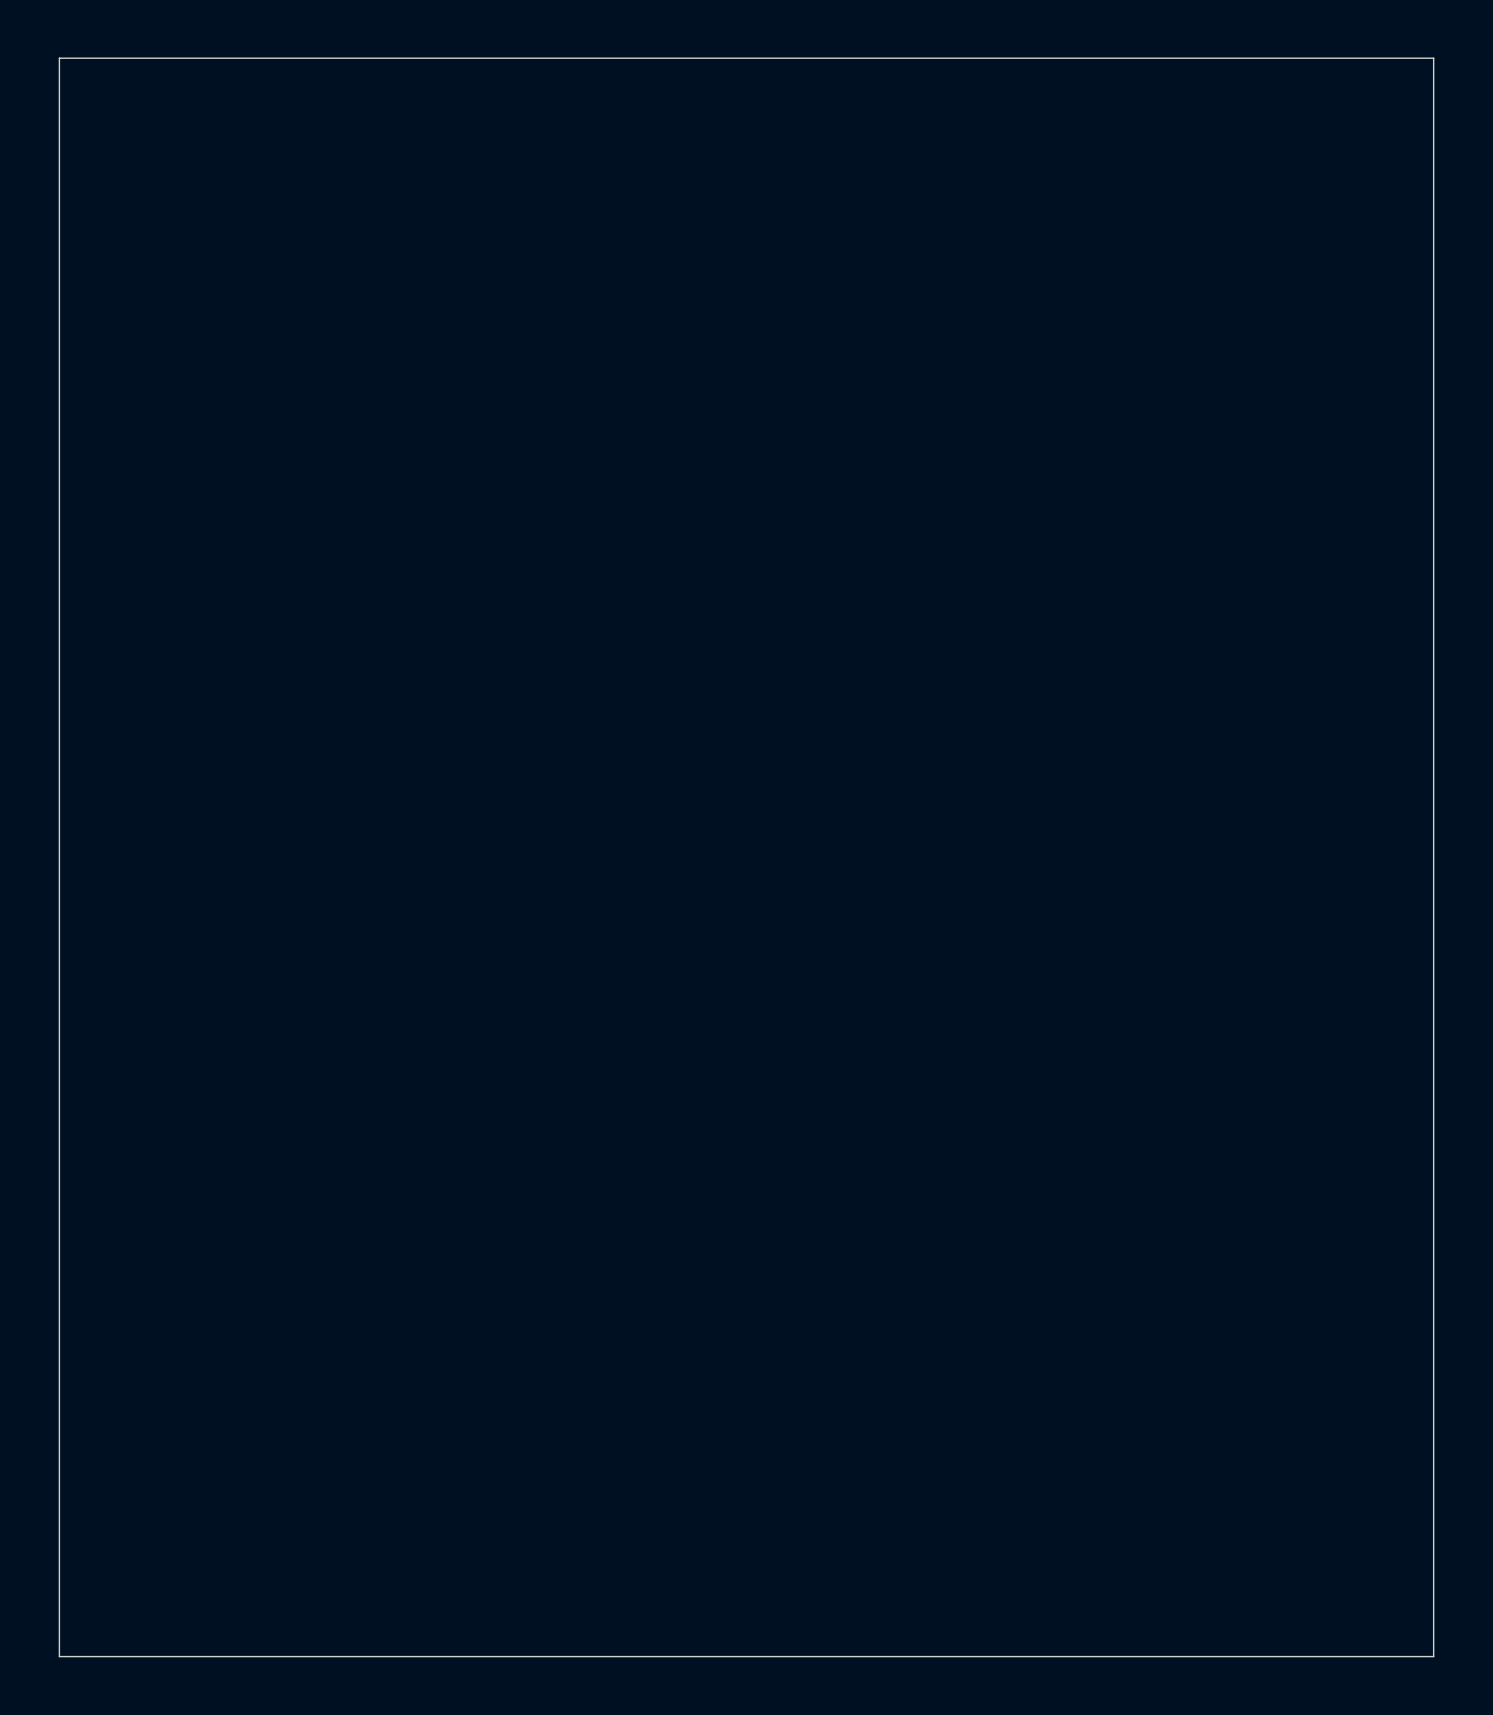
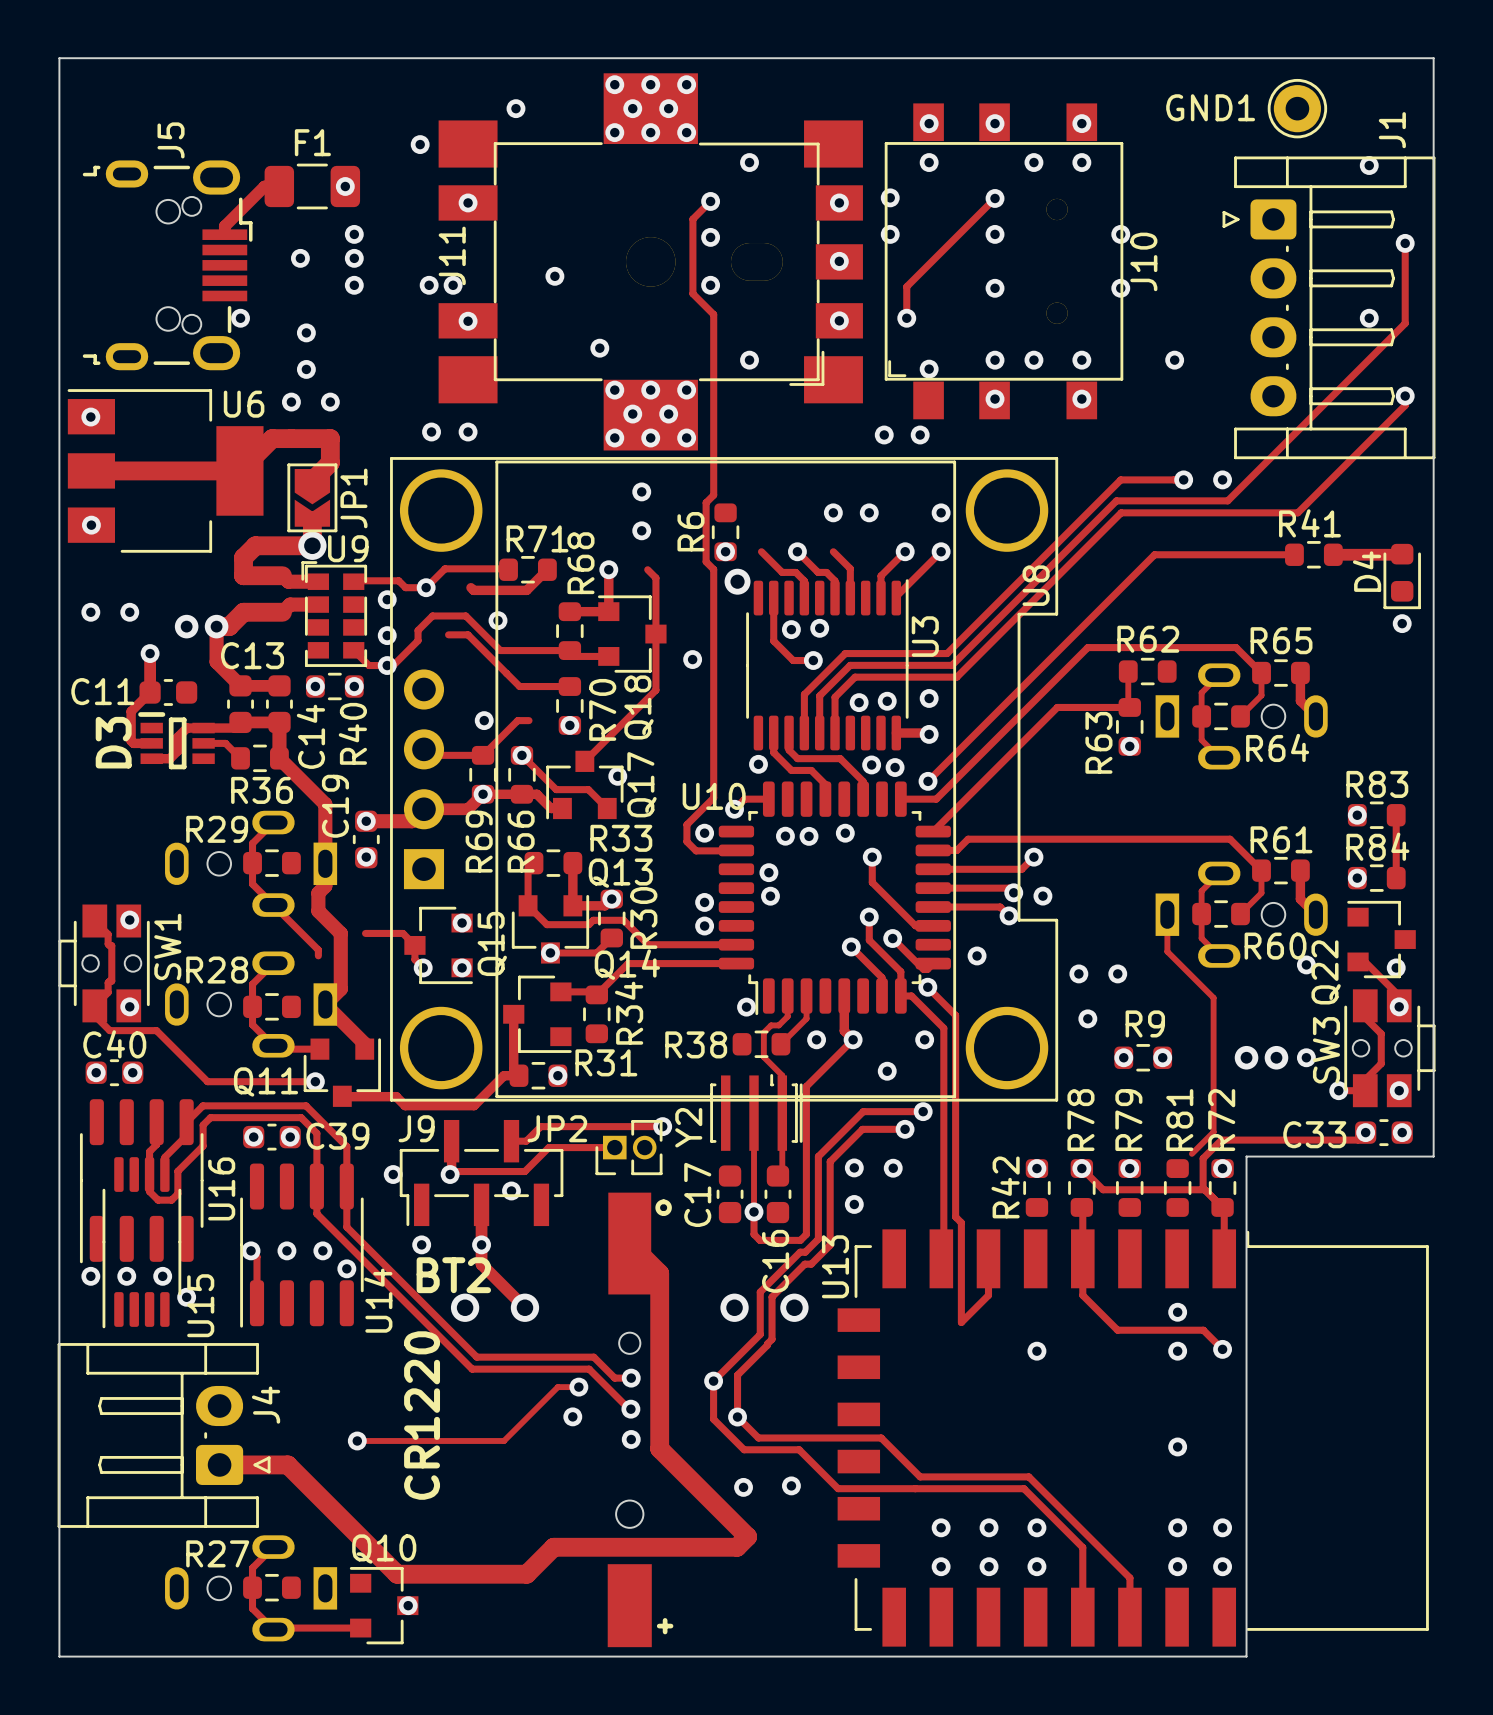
via: none -> (614, 84)
via: none -> (650, 84)
via: none -> (686, 84)
via: none -> (515, 108)
via: none -> (632, 108)
via: none -> (668, 108)
GND1: none -> (1297, 108)
via: none -> (929, 123)
via: none -> (995, 123)
via: none -> (1081, 123)
via: none -> (614, 132)
via: none -> (650, 132)
via: none -> (686, 132)
via: none -> (420, 144)
via: none -> (749, 162)
via: none -> (929, 162)
via: none -> (1033, 162)
via: none -> (1081, 162)
via: none -> (1369, 165)
track: none -> (279, 186) (264, 186) (224, 226) (224, 234)
F1: none -> (312, 186)
via: none -> (345, 186)
via: none -> (890, 197)
track: none -> (995, 198) (906, 286) (906, 318)
via: none -> (995, 198)
track: none -> (710, 201) (692, 219) (692, 293) (713, 314) (713, 495) (706, 502) (706, 561) (713, 569) (713, 797) (686, 824) (686, 841) (696, 850) (736, 850)
via: none -> (710, 201)
via: none -> (468, 202)
via: none -> (839, 202)
via: none -> (354, 234)
via: none -> (890, 234)
via: none -> (995, 234)
via: none -> (1120, 234)
via: none -> (710, 237)
track: none -> (1405, 243) (1405, 323) (1227, 500) (1116, 500) (952, 665) (850, 665) (819, 695) (819, 733)
via: none -> (1405, 243)
via: none -> (300, 258)
via: none -> (354, 258)
J11: none -> (650, 261)
via: none -> (839, 261)
J10: none -> (1004, 261)
J5: none -> (167, 265)
via: none -> (554, 276)
via: none -> (354, 285)
via: none -> (429, 285)
via: none -> (453, 285)
via: none -> (710, 285)
via: none -> (995, 288)
via: none -> (1120, 288)
J1: none -> (1328, 307)
via: none -> (240, 318)
via: none -> (906, 318)
via: none -> (1369, 318)
via: none -> (839, 320)
via: none -> (468, 321)
via: none -> (306, 332)
via: none -> (599, 348)
via: none -> (749, 360)
via: none -> (995, 360)
via: none -> (1033, 360)
via: none -> (1081, 360)
via: none -> (1174, 360)
via: none -> (306, 369)
via: none -> (929, 369)
via: none -> (614, 390)
via: none -> (650, 390)
via: none -> (686, 390)
track: none -> (1405, 396) (1405, 405) (1297, 512) (1121, 512) (956, 677) (855, 677) (835, 697) (835, 733)
via: none -> (1405, 396)
via: none -> (995, 399)
via: none -> (1081, 399)
via: none -> (291, 402)
via: none -> (330, 402)
via: none -> (632, 414)
via: none -> (668, 414)
via: none -> (90, 417)
via: none -> (431, 432)
via: none -> (468, 432)
via: none -> (884, 435)
via: none -> (920, 435)
via: none -> (614, 437)
via: none -> (650, 437)
via: none -> (686, 437)
track: none -> (91, 470) (239, 470) (272, 438) (330, 438) (330, 462) (312, 480)
U6: none -> (165, 470)
track: none -> (1183, 479) (1120, 479) (947, 653) (845, 653) (804, 694) (804, 733)
via: none -> (1183, 479)
via: none -> (1222, 479)
via: none -> (641, 491)
JP1: none -> (312, 497)
via: none -> (833, 512)
via: none -> (869, 512)
via: none -> (941, 512)
track: none -> (312, 514) (312, 545) (255, 545) (243, 557) (243, 575) (282, 575) (288, 581) (318, 581)
via: none -> (91, 525)
via: none -> (641, 530)
R6: none -> (725, 532)
via: none -> (312, 545)
via: none -> (725, 551)
track: none -> (761, 551) (782, 572) (795, 572) (804, 580) (804, 598)
track: none -> (797, 551) (818, 572) (826, 572) (835, 580) (835, 598)
via: none -> (797, 551)
track: none -> (833, 551) (850, 568) (850, 598)
track: none -> (905, 551) (880, 575) (880, 598)
via: none -> (905, 551)
track: none -> (941, 551) (896, 598)
via: none -> (941, 551)
track: none -> (1294, 554) (1154, 554) (928, 781)
R41: none -> (1313, 554)
track: none -> (1402, 554) (1333, 554)
track: none -> (508, 569) (445, 568) (426, 587) (405, 587) (398, 580) (353, 581)
R71: none -> (527, 569)
track: none -> (547, 569) (526, 590) (473, 590) (470, 587)
track: none -> (608, 569) (608, 611) (569, 611)
via: none -> (608, 569)
track: none -> (647, 569) (655, 577) (655, 690) (584, 761)
D4: none -> (1402, 576)
via: none -> (737, 581)
via: none -> (426, 587)
track: none -> (773, 598) (773, 641) (793, 660) (813, 660)
via: none -> (387, 599)
track: none -> (318, 604) (290, 604) (282, 612) (243, 612) (229, 626) (216, 626) (216, 661) (240, 685) (279, 685)
via: none -> (90, 612)
via: none -> (129, 612)
U9: none -> (334, 614)
via: none -> (498, 620)
via: none -> (1402, 623)
via: none -> (186, 626)
via: none -> (216, 626)
via: none -> (819, 628)
via: none -> (791, 629)
R68: none -> (569, 631)
track: none -> (448, 634) (468, 634) (519, 686) (569, 686)
Q18: none -> (632, 634)
via: none -> (387, 635)
track: none -> (353, 650) (368, 665) (393, 665) (418, 640) (418, 630) (432, 615) (465, 615) (500, 650) (569, 650) (575, 656) (608, 656)
track: none -> (150, 653) (150, 692) (131, 711) (131, 740) (133, 743) (151, 743)
via: none -> (150, 653)
via: none -> (692, 659)
via: none -> (813, 660)
U3: none -> (827, 664)
via: none -> (387, 665)
track: none -> (1128, 671) (1129, 707) (1057, 707) (933, 831)
R62: none -> (1147, 671)
R65: none -> (1280, 673)
track: none -> (1300, 673) (1300, 700) (1315, 716)
track: none -> (1219, 675) (1201, 692) (1201, 740) (1219, 757)
via: none -> (315, 686)
R40: none -> (334, 686)
via: none -> (354, 686)
C11: none -> (168, 692)
via: none -> (929, 698)
via: none -> (887, 701)
via: none -> (859, 702)
C13: none -> (240, 704)
C14: none -> (279, 704)
R70: none -> (569, 705)
R64: none -> (1221, 716)
track: none -> (1240, 716) (1261, 695) (1261, 673) (1236, 647) (1087, 647) (936, 799) (900, 799)
part: none -> (1241, 716)
via: none -> (484, 720)
track: none -> (529, 720) (517, 720) (483, 755) (429, 755) (423, 749)
track: none -> (276, 722) (240, 722) (234, 728) (186, 728) (177, 737) (177, 750) (169, 758) (151, 758)
track: none -> (279, 722) (279, 758) (325, 804) (325, 886) (318, 893) (318, 911) (340, 933) (340, 989) (325, 1004) (364, 1043) (364, 1049)
via: none -> (569, 725)
R63: none -> (1129, 726)
track: none -> (773, 733) (773, 752) (791, 770) (811, 770) (825, 784) (825, 799)
track: none -> (789, 733) (789, 750) (797, 758) (840, 758) (863, 781) (863, 799)
track: none -> (896, 733) (929, 734)
via: none -> (929, 734)
D3: none -> (176, 740)
track: none -> (203, 743) (225, 743) (240, 758)
via: none -> (1129, 746)
track: none -> (521, 755) (556, 789) (588, 789) (607, 808)
via: none -> (521, 755)
R36: none -> (259, 758)
via: none -> (758, 764)
via: none -> (871, 764)
via: none -> (895, 767)
R69: none -> (483, 774)
R66: none -> (521, 774)
via: none -> (617, 776)
U8: none -> (724, 779)
via: none -> (928, 781)
Q17: none -> (584, 785)
via: none -> (483, 794)
track: none -> (768, 799) (744, 799) (734, 809)
track: none -> (562, 808) (551, 808) (536, 794) (483, 794) (468, 809) (423, 809) (412, 821) (366, 821)
via: none -> (734, 809)
via: none -> (1357, 815)
R83: none -> (1376, 815)
track: none -> (1396, 815) (1396, 878)
via: none -> (366, 821)
track: none -> (273, 822) (252, 843) (252, 884) (318, 949) (318, 955)
via: none -> (704, 833)
via: none -> (845, 833)
via: none -> (785, 836)
via: none -> (809, 836)
C19: none -> (366, 839)
track: none -> (933, 850) (956, 850) (968, 839) (1230, 839) (1261, 870) (1261, 893) (1240, 914)
via: none -> (366, 857)
track: none -> (872, 857) (872, 882) (915, 925) (933, 925)
via: none -> (872, 857)
track: none -> (1033, 857) (1021, 869) (933, 869)
via: none -> (1033, 857)
part: none -> (251, 863)
R29: none -> (271, 863)
track: none -> (533, 863) (528, 869) (528, 905) (546, 924) (588, 924) (593, 920) (623, 920) (648, 944) (736, 944)
R33: none -> (553, 863)
track: none -> (572, 863) (572, 905) (605, 905) (611, 899)
R61: none -> (1280, 870)
track: none -> (1300, 870) (1300, 899) (1315, 914)
via: none -> (768, 872)
track: none -> (1219, 873) (1201, 891) (1201, 938) (1219, 955)
via: none -> (1357, 878)
R84: none -> (1376, 878)
track: none -> (933, 888) (1009, 888) (1013, 892)
via: none -> (1013, 892)
via: none -> (770, 896)
via: none -> (1042, 896)
U10: none -> (834, 898)
via: none -> (611, 899)
via: none -> (704, 902)
track: none -> (933, 907) (1000, 907) (1009, 915)
track: none -> (1167, 914) (1167, 951) (1213, 997) (1213, 1132) (1191, 1153)
R60: none -> (1221, 914)
part: none -> (1241, 914)
via: none -> (1009, 915)
track: none -> (869, 917) (869, 940) (900, 971) (900, 996) (911, 996) (943, 1028) (943, 1256) (941, 1258)
via: none -> (869, 917)
R30: none -> (611, 918)
via: none -> (129, 920)
track: none -> (94, 921) (108, 934) (108, 944) (111, 945) (111, 981) (108, 982) (108, 992) (94, 1005) (94, 1015) (109, 1030) (156, 1030) (207, 1081) (315, 1081)
via: none -> (462, 923)
via: none -> (704, 926)
Q13: none -> (550, 929)
track: none -> (365, 933) (402, 933) (414, 945) (414, 959) (423, 967)
track: none -> (611, 937) (596, 952) (550, 952)
track: none -> (892, 938) (923, 969) (927, 969) (933, 963)
via: none -> (892, 938)
Q22: none -> (1381, 939)
Q15: none -> (438, 945)
track: none -> (851, 946) (882, 977) (882, 996)
via: none -> (851, 946)
via: none -> (550, 952)
via: none -> (977, 955)
track: none -> (1358, 961) (1365, 961) (1399, 996) (1399, 1005)
SW1: none -> (104, 963)
track: none -> (273, 963) (252, 984) (252, 1024) (276, 1049) (319, 1049)
track: none -> (736, 963) (628, 963) (596, 994) (593, 991) (560, 991)
via: none -> (1306, 964)
via: none -> (423, 967)
via: none -> (462, 967)
via: none -> (1396, 967)
via: none -> (1078, 973)
via: none -> (1117, 973)
via: none -> (927, 987)
track: none -> (929, 988) (955, 1015) (955, 1216) (961, 1222) (961, 1322) (988, 1295) (988, 1258)
track: none -> (787, 996) (787, 1016) (778, 1025) (771, 1025) (763, 1032) (763, 1057) (782, 1075) (782, 1171) (777, 1176)
track: none -> (806, 996) (806, 1018) (780, 1044)
track: none -> (844, 996) (844, 1030) (853, 1039) (806, 1086) (806, 1234) (800, 1240) (760, 1240) (754, 1234) (754, 1113)
part: none -> (251, 1004)
track: none -> (1365, 1005) (1365, 1017) (1381, 1033) (1381, 1063) (1365, 1079) (1365, 1090) (1338, 1090)
via: none -> (129, 1006)
R28: none -> (271, 1006)
via: none -> (1399, 1006)
via: none -> (746, 1007)
track: none -> (513, 1014) (513, 1070) (519, 1075) (504, 1075) (474, 1105) (405, 1105) (396, 1096) (342, 1096)
Q14: none -> (537, 1014)
R34: none -> (596, 1014)
via: none -> (1087, 1018)
via: none -> (816, 1039)
via: none -> (853, 1039)
via: none -> (924, 1039)
R38: none -> (761, 1044)
SW3: none -> (1389, 1048)
via: none -> (1123, 1057)
R9: none -> (1143, 1057)
via: none -> (1162, 1057)
via: none -> (1246, 1057)
via: none -> (1276, 1057)
via: none -> (1306, 1057)
via: none -> (887, 1071)
via: none -> (96, 1072)
C40: none -> (114, 1072)
via: none -> (132, 1072)
Q11: none -> (342, 1072)
R31: none -> (538, 1075)
via: none -> (557, 1075)
via: none -> (315, 1081)
via: none -> (1338, 1090)
via: none -> (1399, 1090)
track: none -> (923, 1111) (863, 1111) (818, 1156) (818, 1239) (805, 1252) (800, 1252) (760, 1292) (760, 1334) (713, 1381) (713, 1419) (744, 1449) (799, 1449) (838, 1488) (1024, 1488) (1082, 1547) (1082, 1617)
via: none -> (923, 1111)
Y2: none -> (756, 1112)
track: none -> (156, 1122) (156, 1144) (149, 1151) (149, 1191) (158, 1200) (171, 1200) (177, 1193) (177, 1171) (203, 1146) (203, 1125) (210, 1117) (301, 1117) (316, 1133) (316, 1213) (472, 1369) (589, 1369) (630, 1409)
track: none -> (662, 1126) (540, 1126) (526, 1141) (511, 1141)
via: none -> (662, 1126)
track: none -> (905, 1129) (862, 1129) (830, 1161) (830, 1245) (811, 1264) (804, 1264) (772, 1297) (772, 1339) (737, 1375) (737, 1417) (758, 1437) (881, 1437) (920, 1476) (1028, 1476) (1129, 1577) (1129, 1617)
via: none -> (905, 1129)
track: none -> (1365, 1132) (1358, 1140) (1221, 1140) (1203, 1158) (1203, 1188) (1224, 1209) (1224, 1258)
via: none -> (1365, 1132)
C33: none -> (1383, 1132)
via: none -> (1402, 1132)
via: none -> (253, 1137)
C39: none -> (271, 1137)
via: none -> (290, 1137)
track: none -> (451, 1141) (450, 1174) (453, 1171) (524, 1171) (548, 1147) (614, 1147)
JP2: none -> (628, 1147)
board edge: (1433, 1156) (1433, 1656) (1246, 1656) -> (1433, 1156) (1246, 1156) (1246, 1656)
via: none -> (854, 1167)
via: none -> (893, 1168)
via: none -> (1036, 1168)
track: none -> (1081, 1168) (1103, 1189) (1204, 1189)
via: none -> (1081, 1168)
via: none -> (1129, 1168)
via: none -> (1222, 1168)
J9: none -> (481, 1173)
track: none -> (164, 1174) (164, 1157) (186, 1135) (186, 1122) (202, 1105) (306, 1105) (346, 1146) (346, 1227) (476, 1357) (593, 1357) (614, 1378) (631, 1378)
via: none -> (393, 1174)
via: none -> (450, 1174)
U16: none -> (141, 1181)
R78: none -> (1081, 1187)
R42: none -> (1036, 1188)
R79: none -> (1129, 1188)
R81: none -> (1177, 1188)
R72: none -> (1222, 1188)
via: none -> (511, 1190)
C17: none -> (730, 1194)
C16: none -> (777, 1194)
track: none -> (481, 1204) (481, 1264) (524, 1307)
via: none -> (854, 1204)
track: none -> (1081, 1207) (1082, 1295) (1117, 1330) (1203, 1330) (1222, 1349)
via: none -> (754, 1211)
U15: none -> (141, 1242)
track: none -> (629, 1243) (659, 1273) (659, 1448) (747, 1536) (737, 1547) (553, 1547) (526, 1574) (397, 1574) (287, 1464) (219, 1464)
via: none -> (421, 1244)
via: none -> (481, 1244)
U14: none -> (301, 1245)
track: none -> (251, 1250) (257, 1256) (257, 1303)
via: none -> (251, 1250)
via: none -> (286, 1250)
via: none -> (322, 1250)
via: none -> (346, 1268)
via: none -> (90, 1276)
via: none -> (126, 1276)
via: none -> (162, 1276)
via: none -> (186, 1297)
via: none -> (465, 1307)
via: none -> (524, 1307)
via: none -> (734, 1307)
via: none -> (794, 1307)
via: none -> (1177, 1312)
via: none -> (1222, 1349)
via: none -> (1036, 1351)
via: none -> (1177, 1351)
via: none -> (631, 1378)
via: none -> (713, 1381)
track: none -> (578, 1387) (557, 1387) (504, 1440) (357, 1440)
via: none -> (578, 1387)
via: none -> (630, 1409)
via: none -> (572, 1416)
via: none -> (737, 1417)
BT2: none -> CR1220 (640, 1419)
J4: none -> (164, 1435)
U13: none -> (1133, 1437)
via: none -> (631, 1439)
via: none -> (357, 1440)
via: none -> (1177, 1446)
via: none -> (791, 1485)
via: none -> (743, 1487)
via: none -> (941, 1527)
via: none -> (989, 1527)
via: none -> (1036, 1527)
via: none -> (1177, 1527)
via: none -> (1222, 1527)
track: none -> (273, 1547) (252, 1568) (252, 1608) (273, 1629) (275, 1628) (360, 1628)
via: none -> (941, 1566)
via: none -> (989, 1566)
via: none -> (1036, 1566)
via: none -> (1177, 1566)
via: none -> (1222, 1566)
R27: none -> (271, 1587)
part: none -> (251, 1588)
Q10: none -> (384, 1605)
via: none -> (408, 1605)

